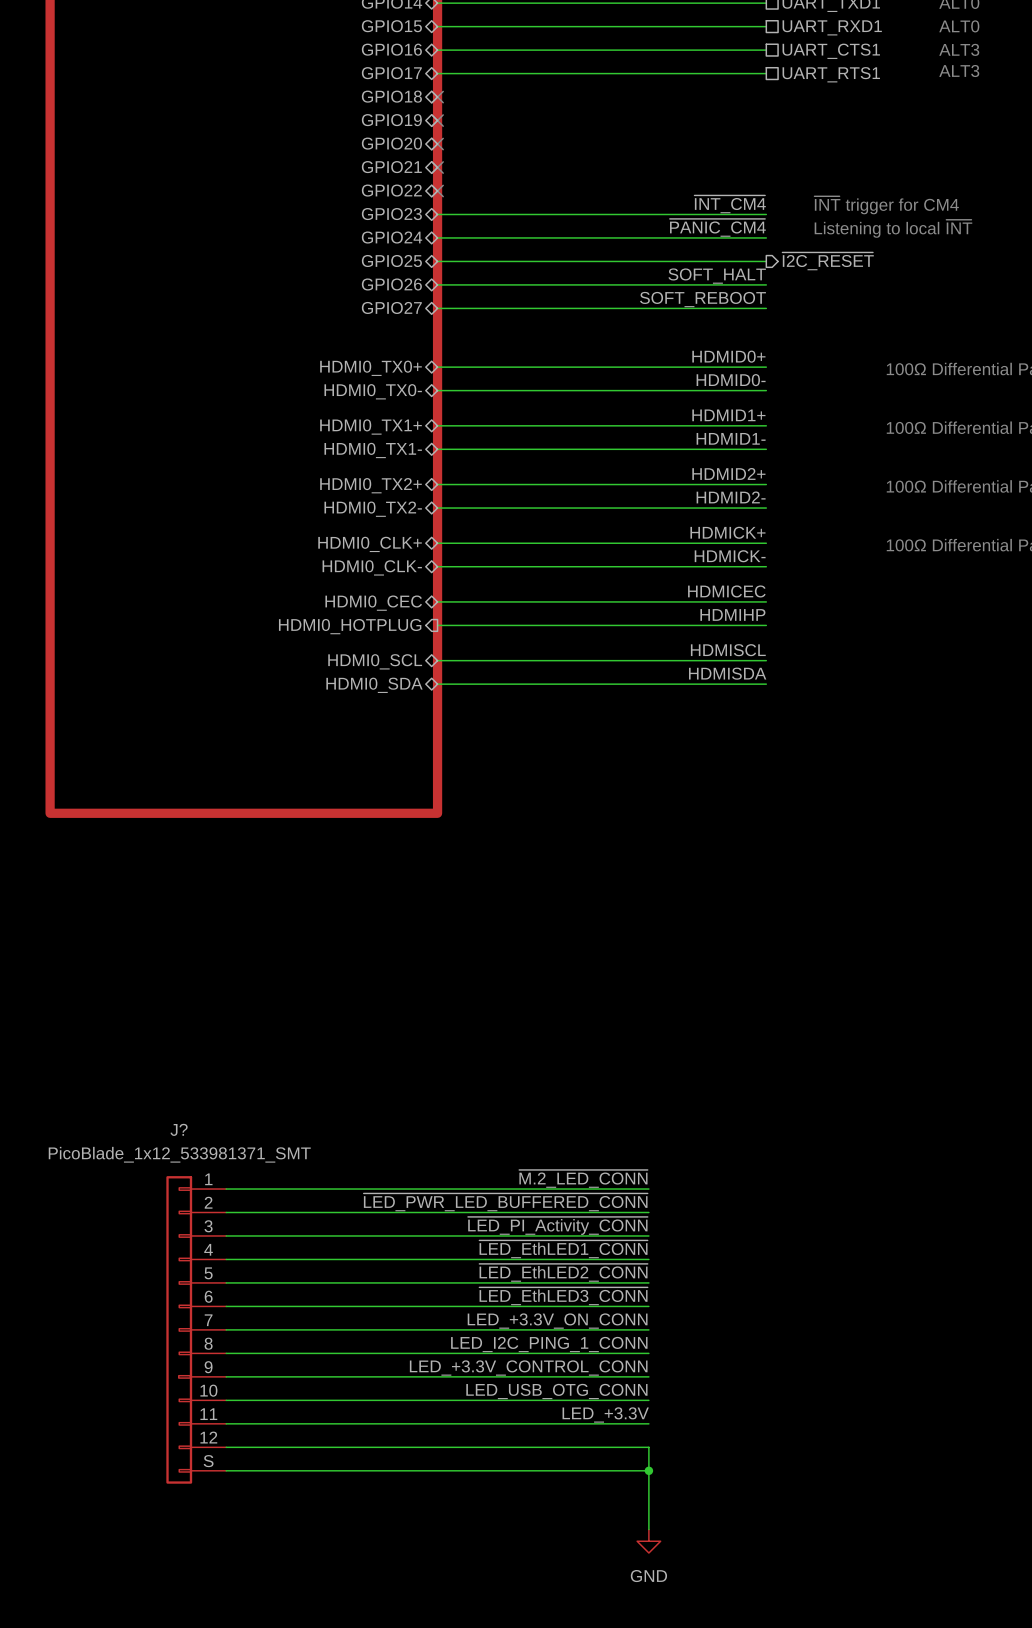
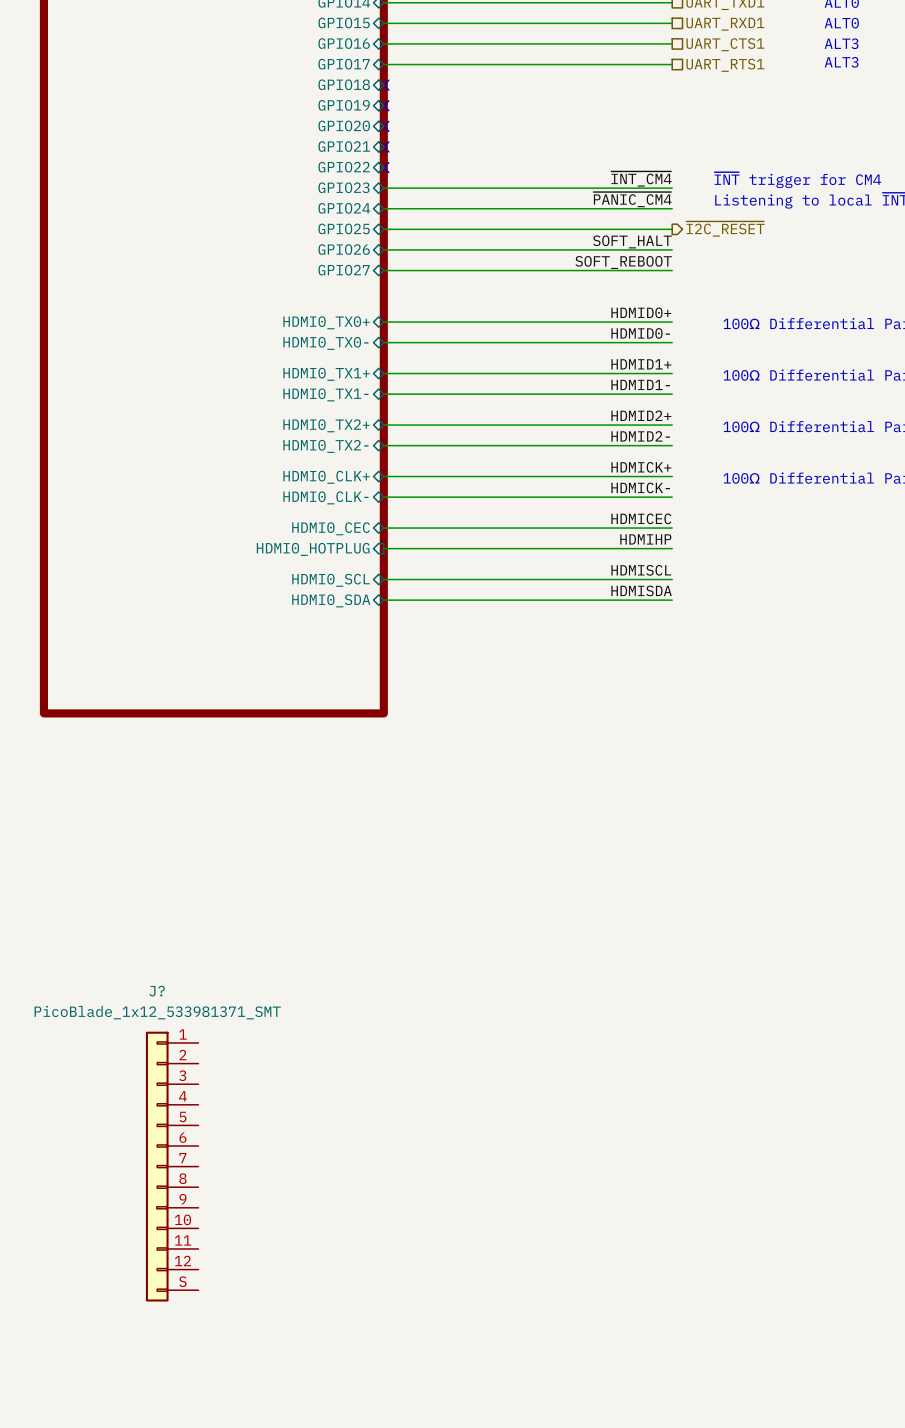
label: ~{M.2_LED_CONN} (583, 1178) -> none
wire: (226, 1189) (648, 1189) -> none
label: ~{LED_PWR_LED_BUFFERED_CONN} (505, 1202) -> none
wire: (226, 1212) (648, 1212) -> none
label: ~{LED_PI_Activity_CONN} (557, 1225) -> none
wire: (226, 1235) (648, 1235) -> none
label: ~{LED_EthLED1_CONN} (563, 1249) -> none
wire: (226, 1259) (648, 1259) -> none
label: ~{LED_EthLED2_CONN} (563, 1272) -> none
wire: (226, 1282) (648, 1282) -> none
label: ~{LED_EthLED3_CONN} (563, 1296) -> none
wire: (226, 1306) (648, 1306) -> none
label: LED_+3.3V_ON_CONN (557, 1321) -> none
wire: (226, 1329) (648, 1329) -> none
label: LED_I2C_PING_1_CONN (549, 1344) -> none
wire: (226, 1353) (648, 1353) -> none
label: LED_+3.3V_CONTROL_CONN (528, 1368) -> none
wire: (226, 1376) (648, 1376) -> none
label: LED_USB_OTG_CONN (556, 1391) -> none
wire: (226, 1400) (648, 1400) -> none
label: LED_+3.3V (605, 1414) -> none
wire: (226, 1423) (648, 1423) -> none
wire: (226, 1447) (648, 1447) (648, 1529) -> none
wire: (226, 1470) (648, 1470) -> none
junction: (648, 1470) -> none
power symbol: GND (648, 1541) -> none

